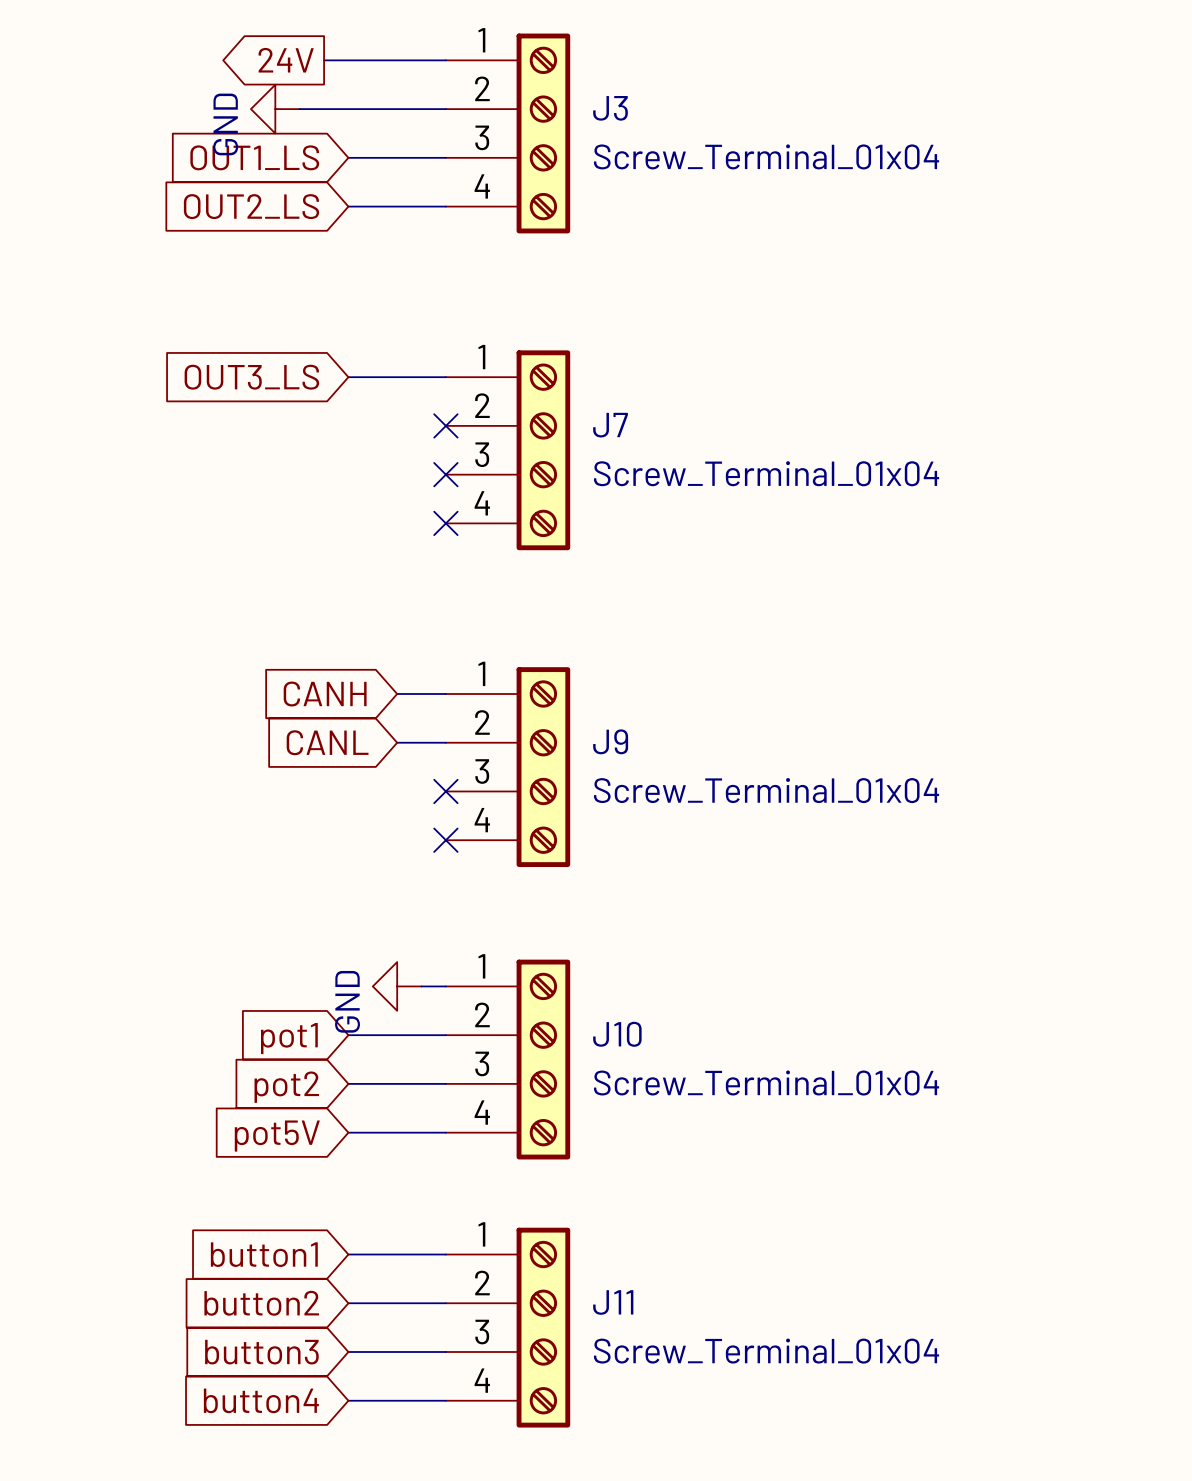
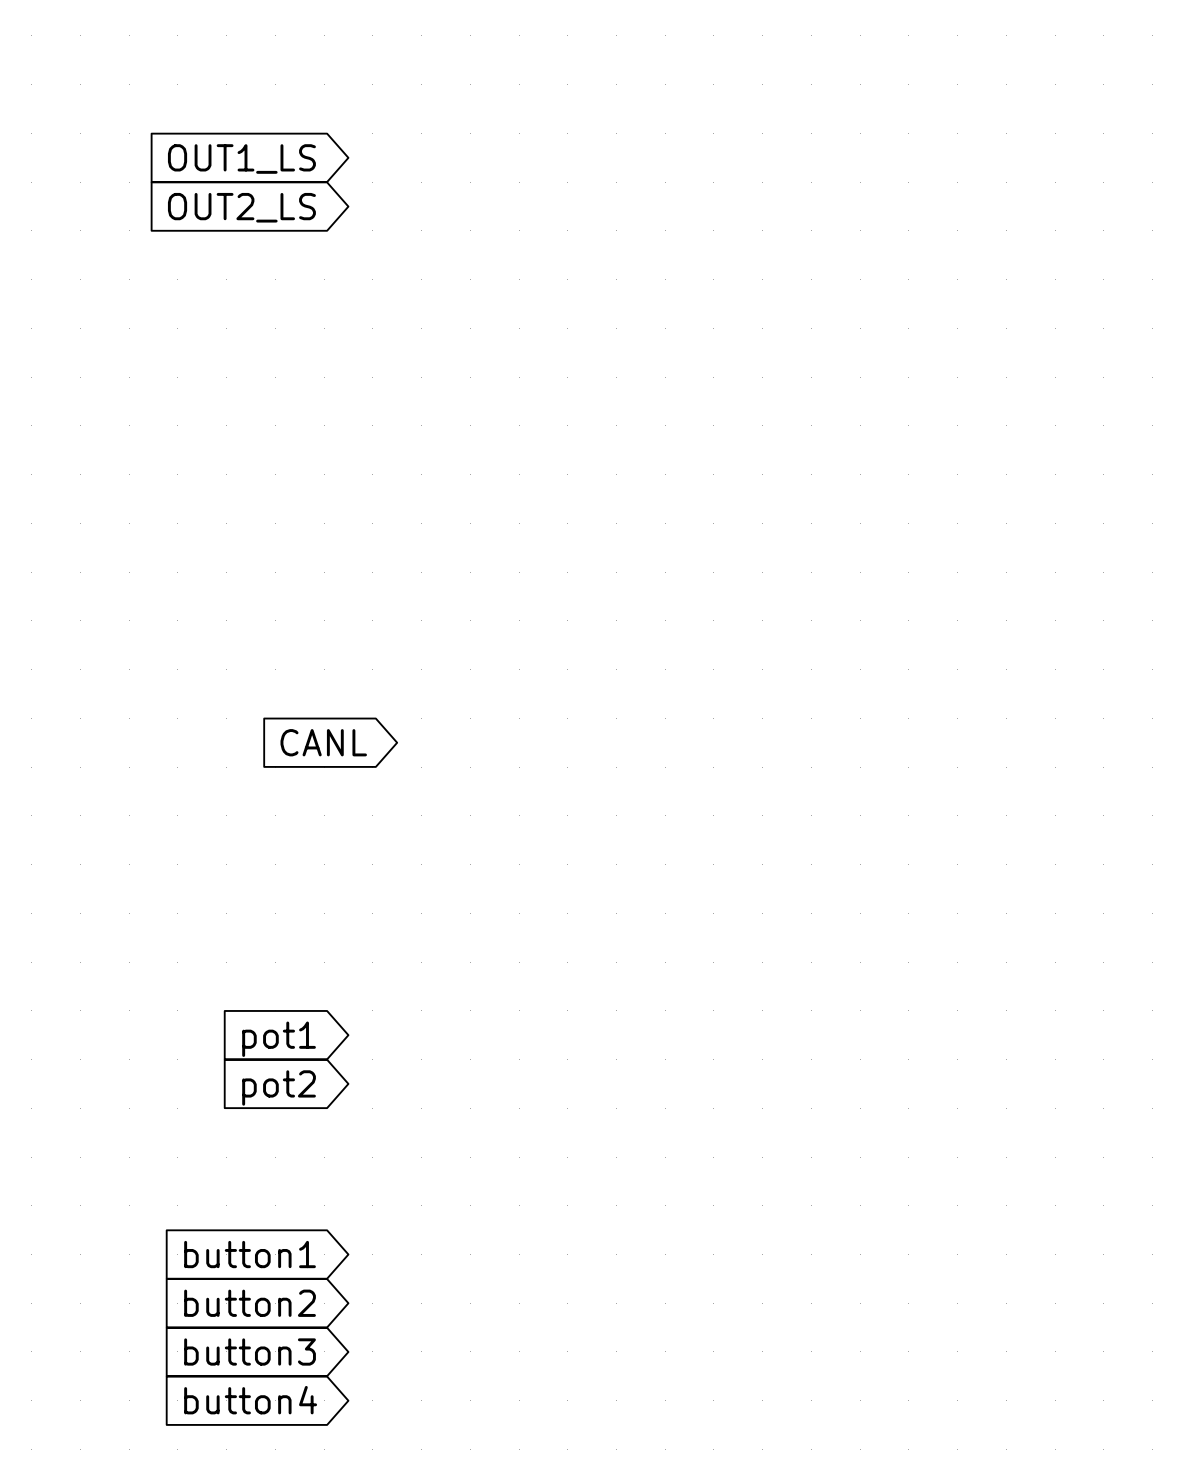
global label: 24V (286, 60) -> none
wire: (324, 60) (445, 60) -> none
power symbol: GND (275, 109) -> none
wire: (299, 109) (445, 109) -> none
J3: Screw_Terminal_01x04 (508, 133) -> none
wire: (348, 157) (445, 157) -> none
wire: (348, 206) (445, 206) -> none
global label: OUT3_LS (251, 377) -> none
wire: (348, 377) (445, 377) -> none
no-connect mark: (445, 425) -> none
J7: Screw_Terminal_01x04 (508, 450) -> none
no-connect mark: (445, 474) -> none
no-connect mark: (445, 523) -> none
wire: (397, 693) (445, 693) -> none
global label: CANH (325, 694) -> none
wire: (397, 742) (445, 742) -> none
J9: Screw_Terminal_01x04 (508, 767) -> none
no-connect mark: (445, 791) -> none
no-connect mark: (445, 840) -> none
power symbol: GND (397, 986) -> none
wire: (421, 986) (445, 986) -> none
wire: (348, 1035) (445, 1035) -> none
J10: Screw_Terminal_01x04 (508, 1059) -> none
wire: (348, 1083) (445, 1083) -> none
wire: (348, 1132) (445, 1132) -> none
global label: pot5V (277, 1136) -> none
wire: (348, 1254) (445, 1254) -> none
wire: (348, 1303) (445, 1303) -> none
J11: Screw_Terminal_01x04 (508, 1327) -> none
wire: (348, 1351) (445, 1351) -> none
wire: (348, 1400) (445, 1400) -> none

